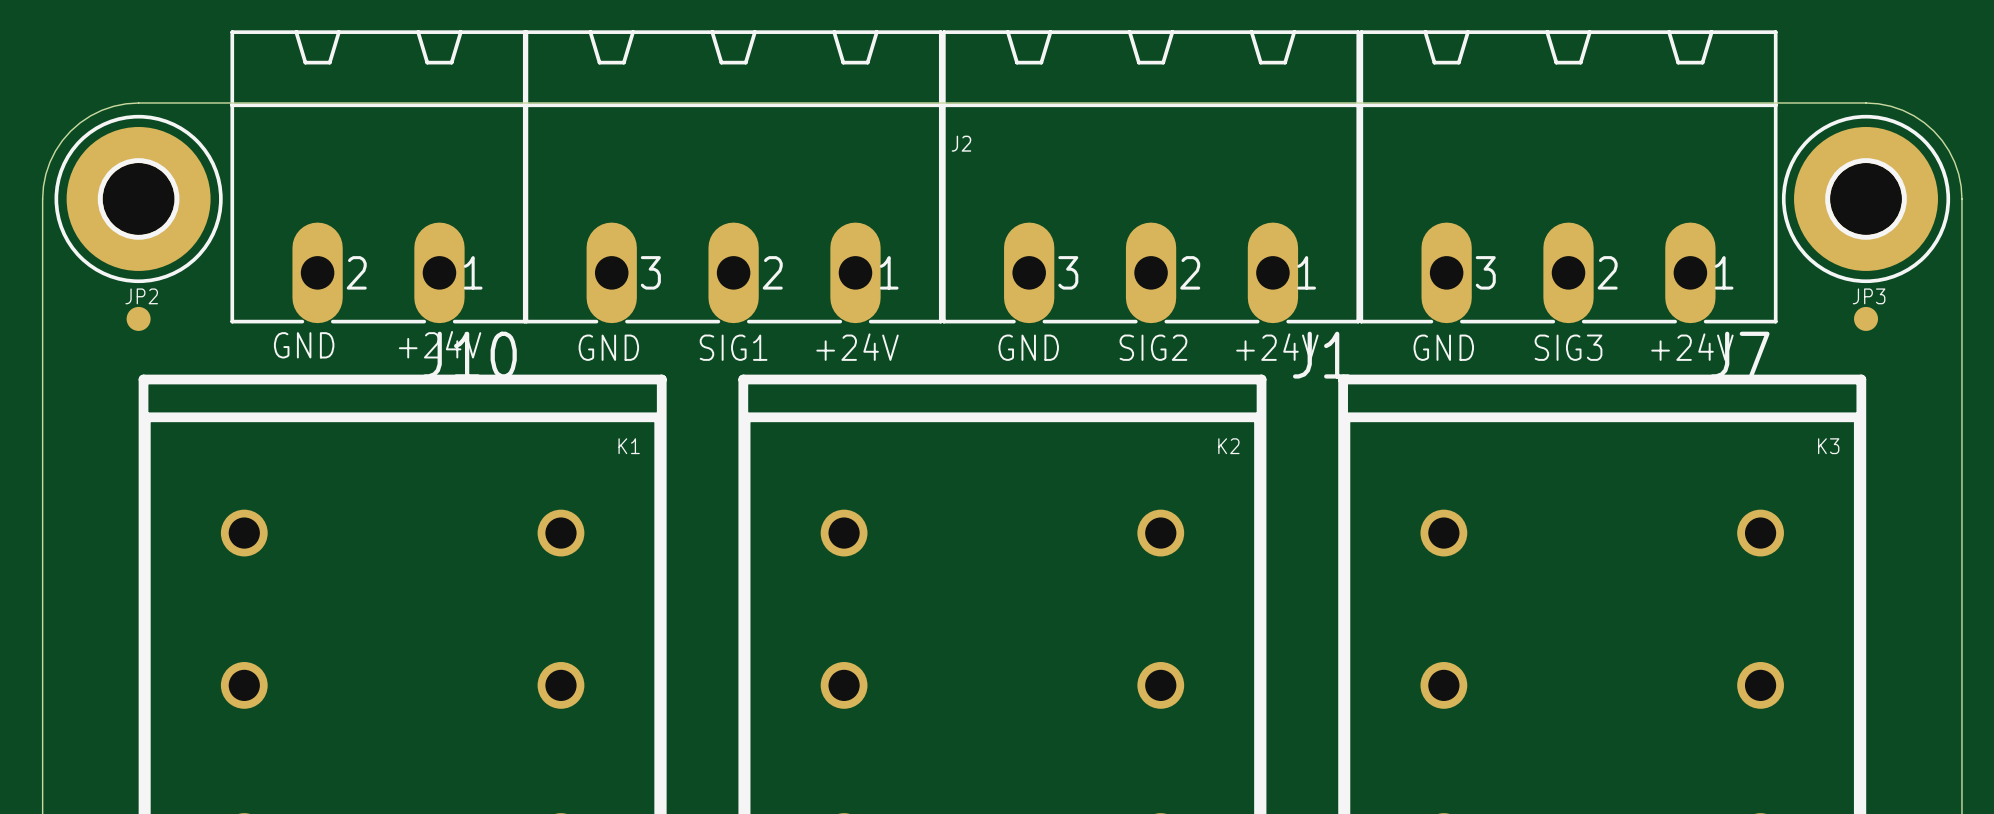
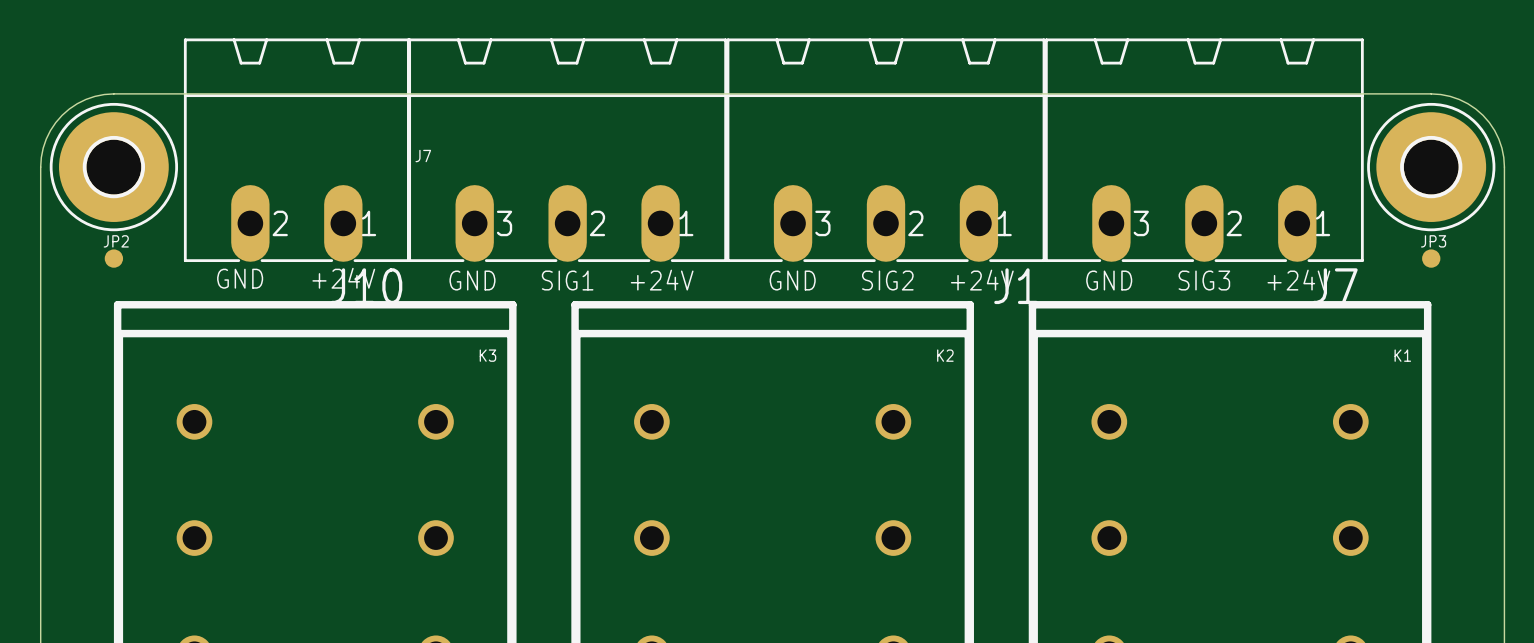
J2 name: J2 (961, 143) -> J7 (423, 156)
K1 name: K1 (629, 446) -> K3 (487, 355)
K3 name: K3 (1828, 446) -> K1 (1402, 355)

